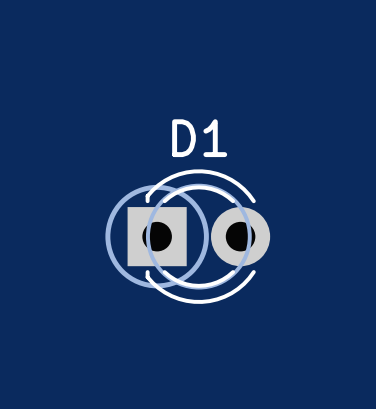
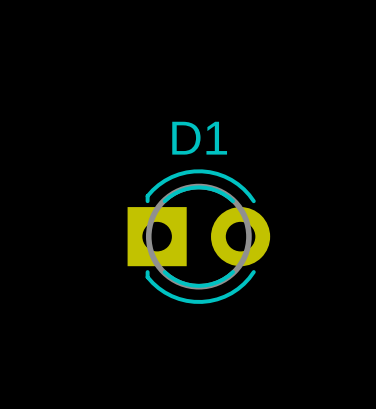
D1 footprint: [105, 169, 271, 304] -> [127, 169, 271, 304]

